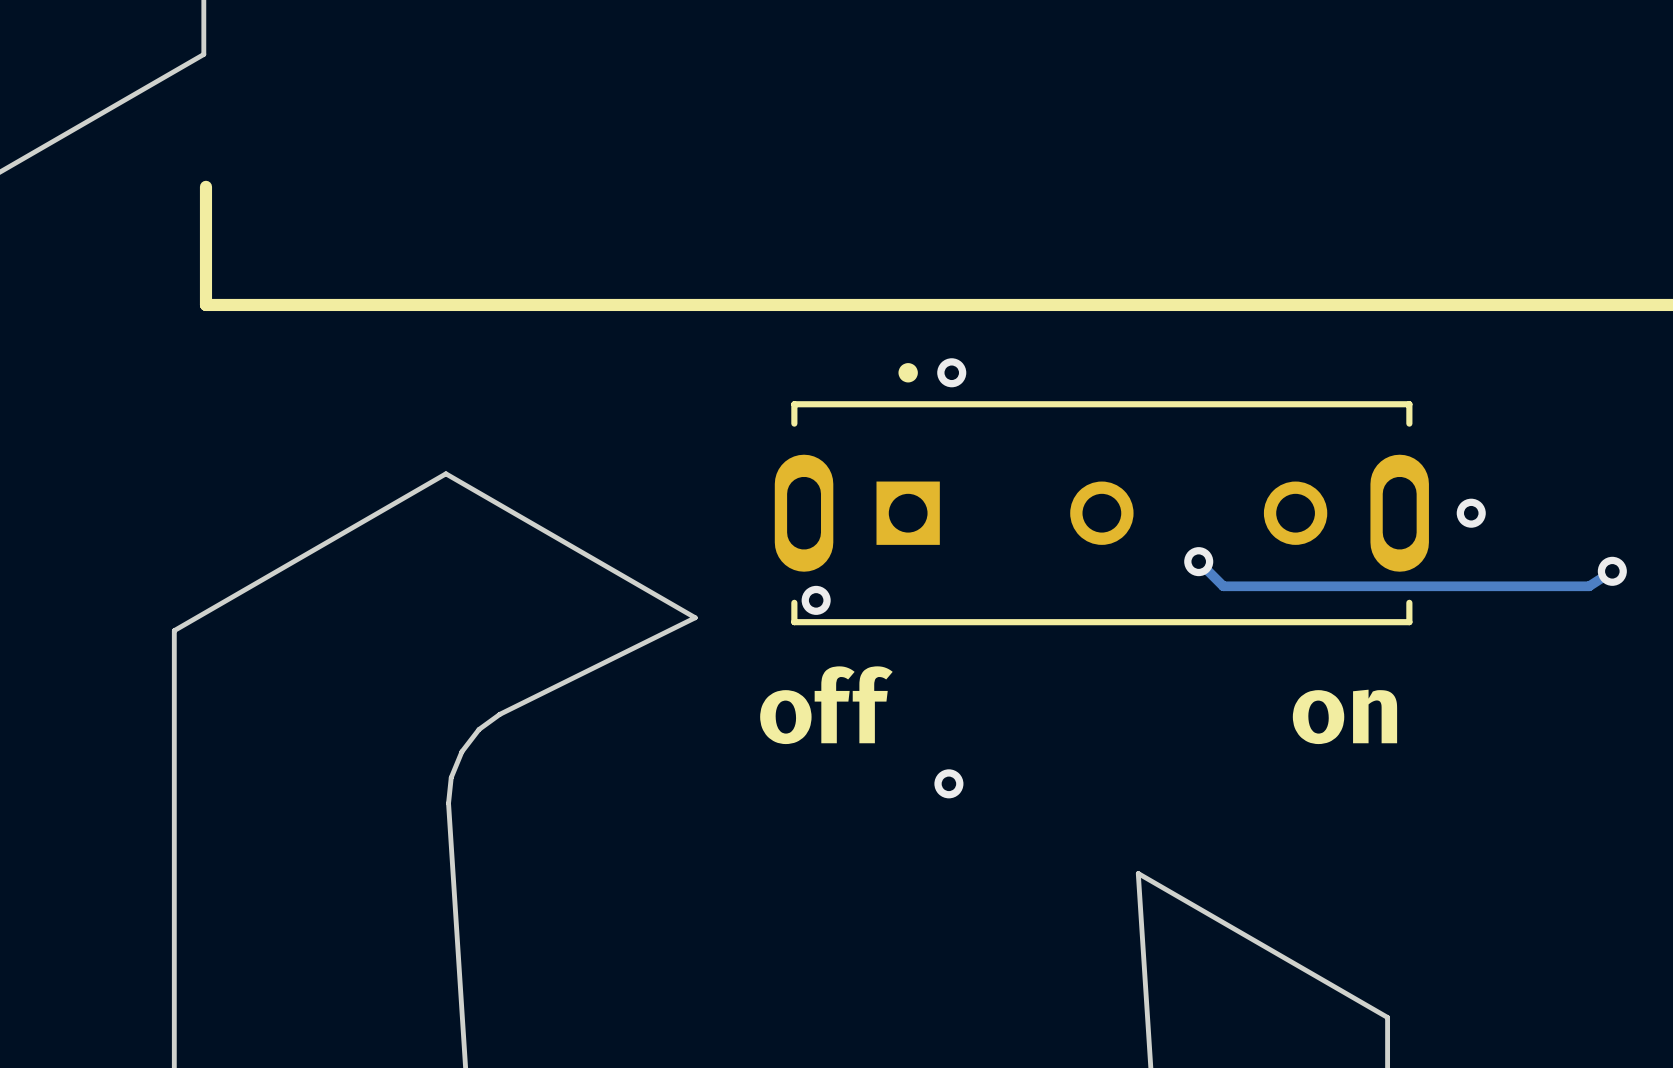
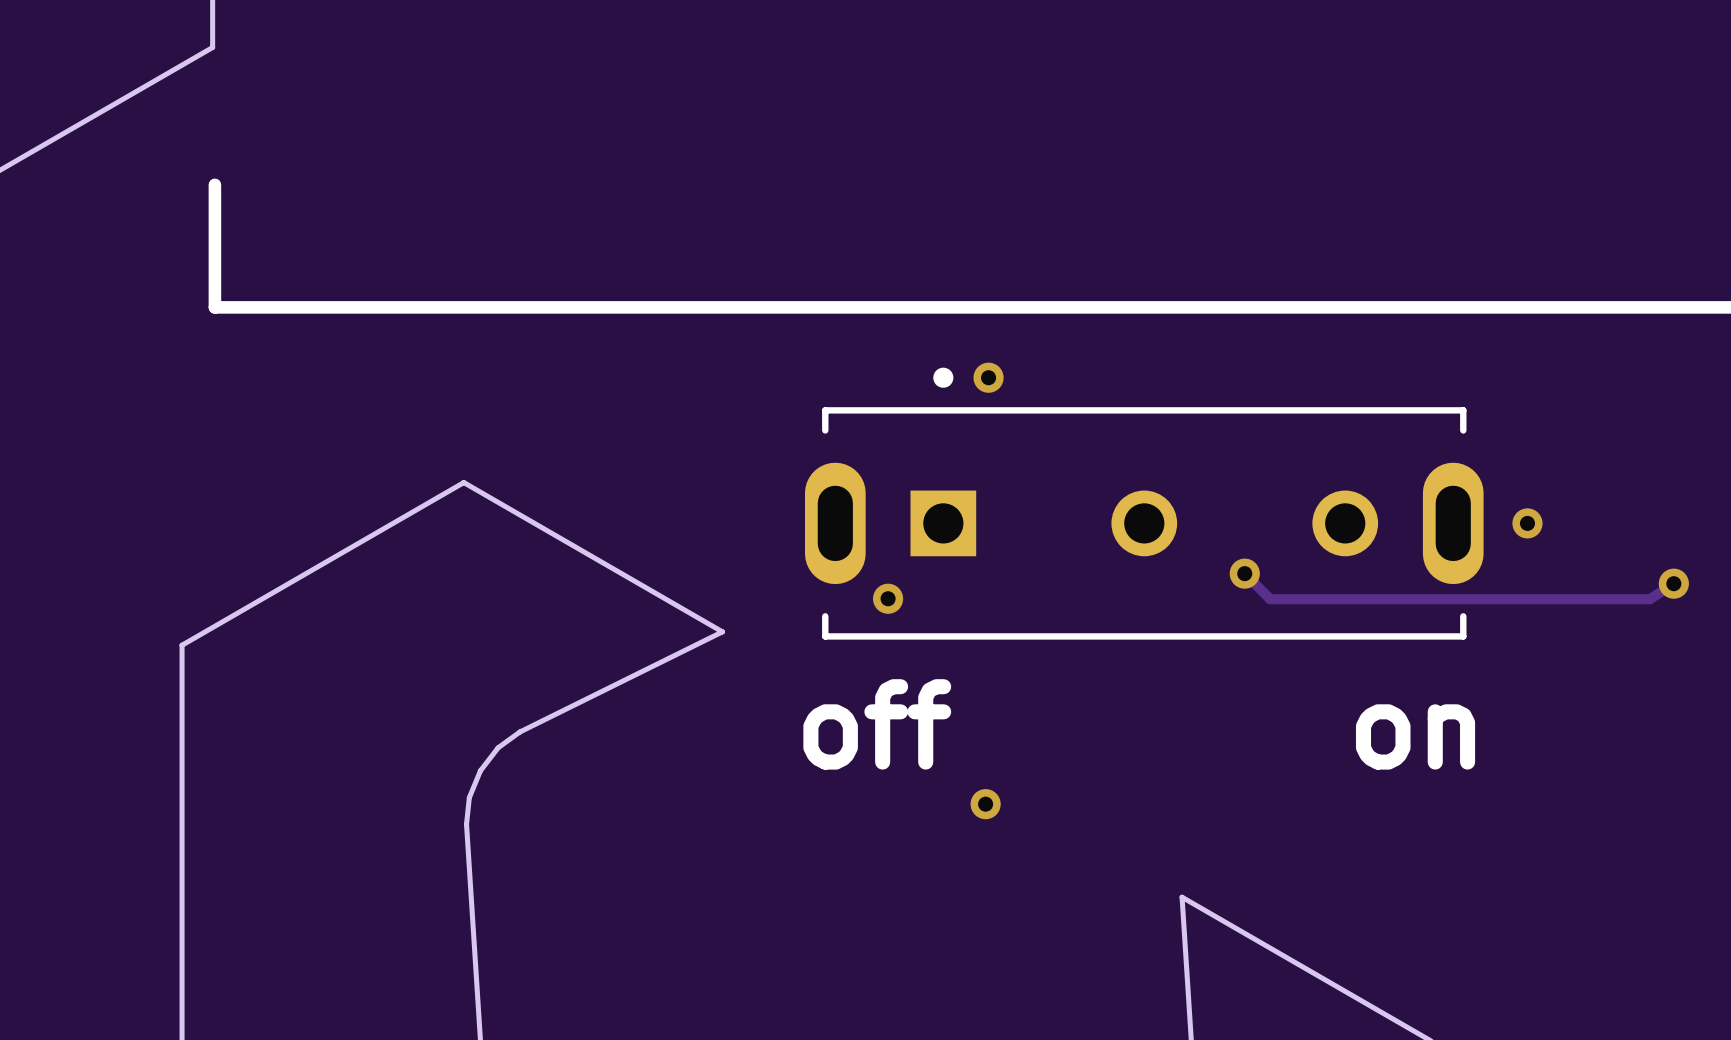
via position: (816, 600) -> (888, 598)

